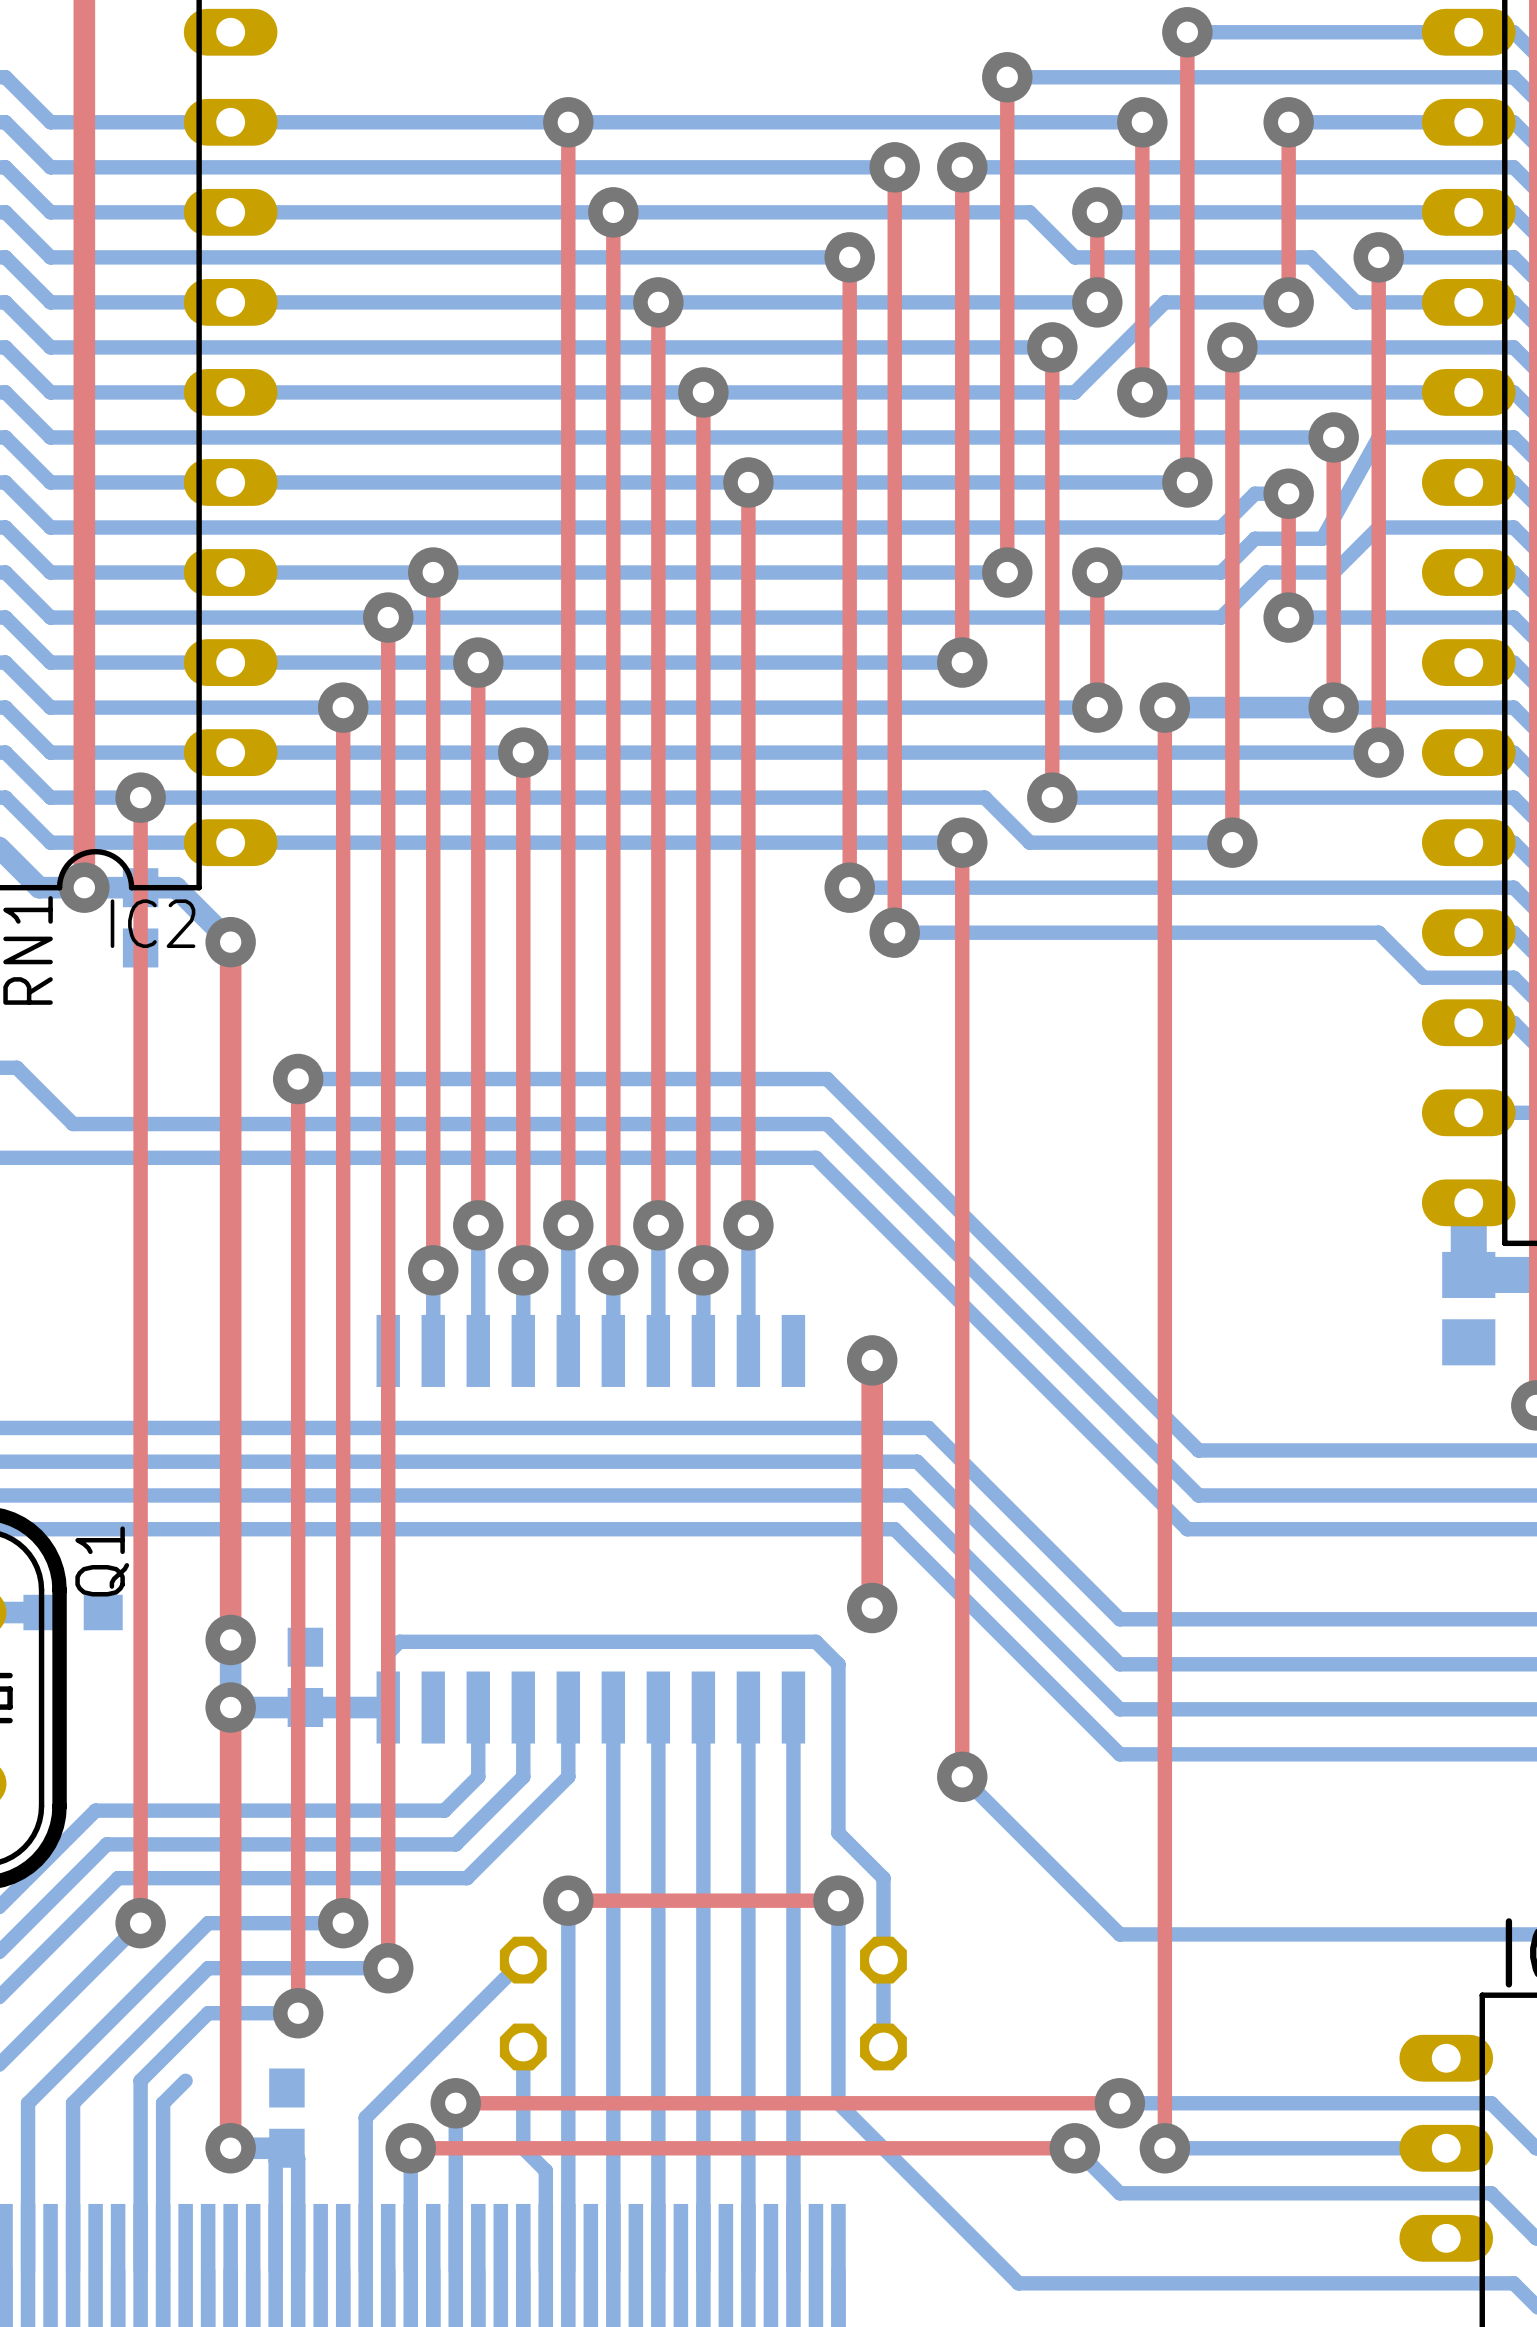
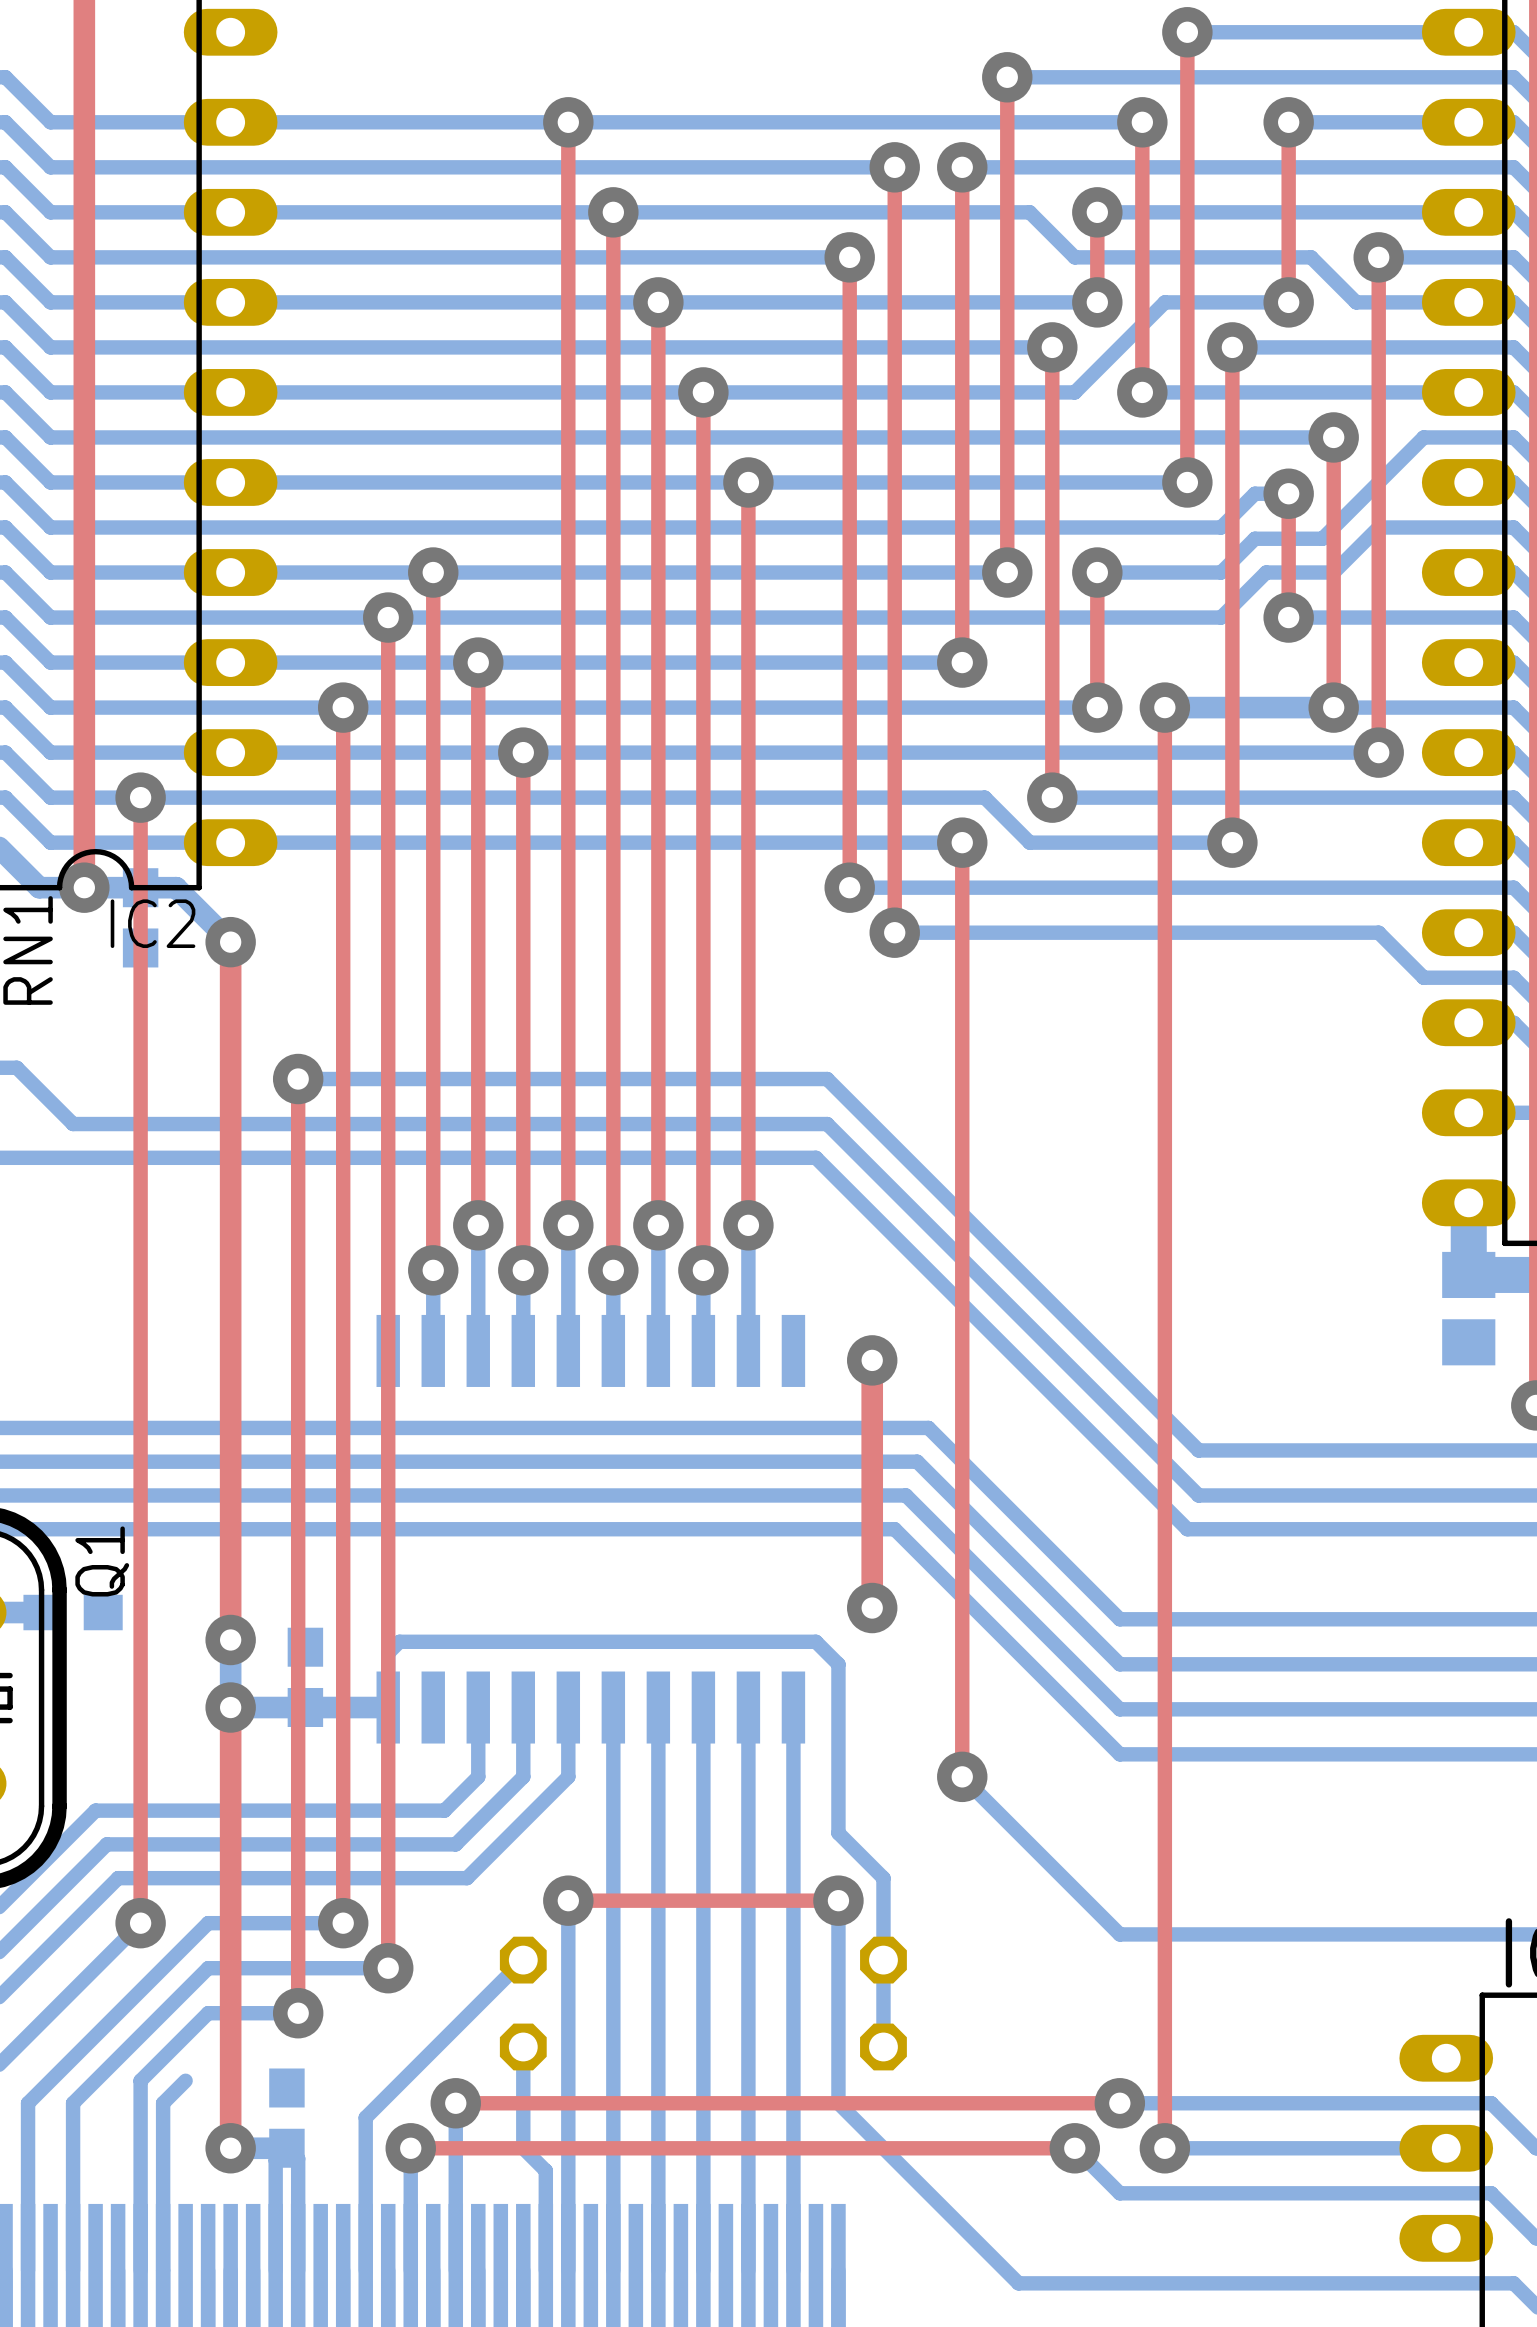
bottom track: (1423, 437) (1378, 437) (1322, 538) -> (1423, 437) (1322, 538)

